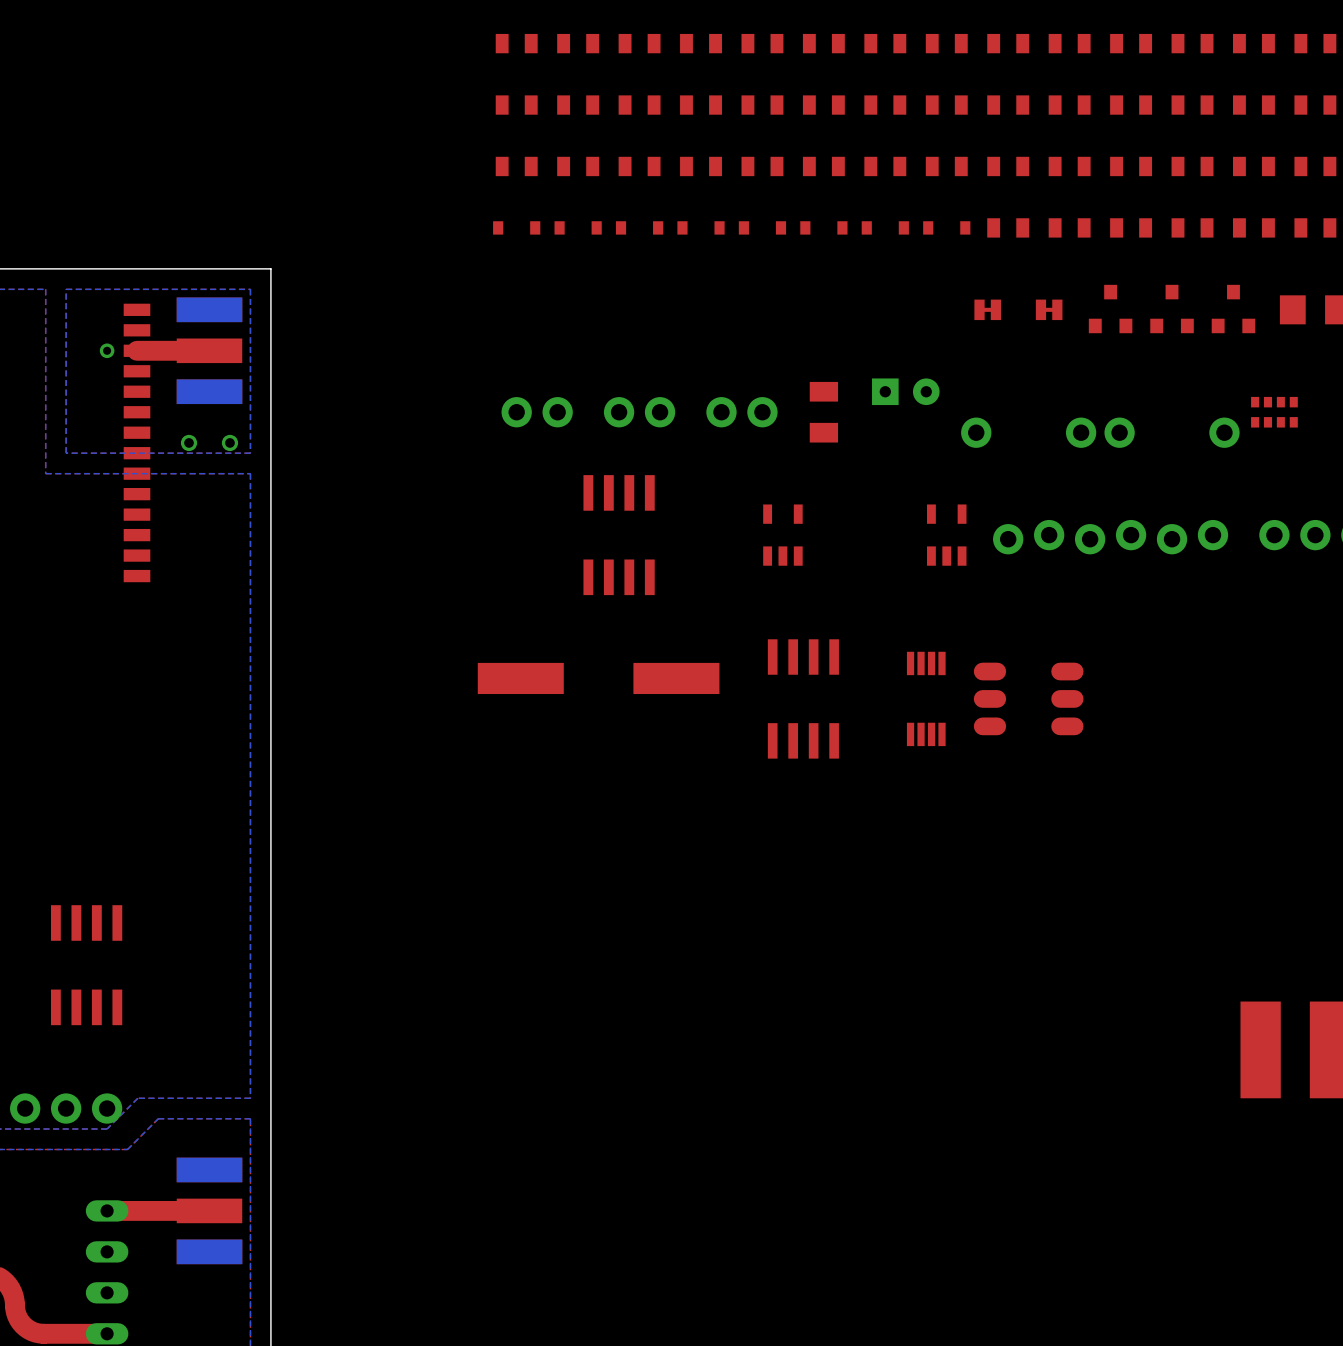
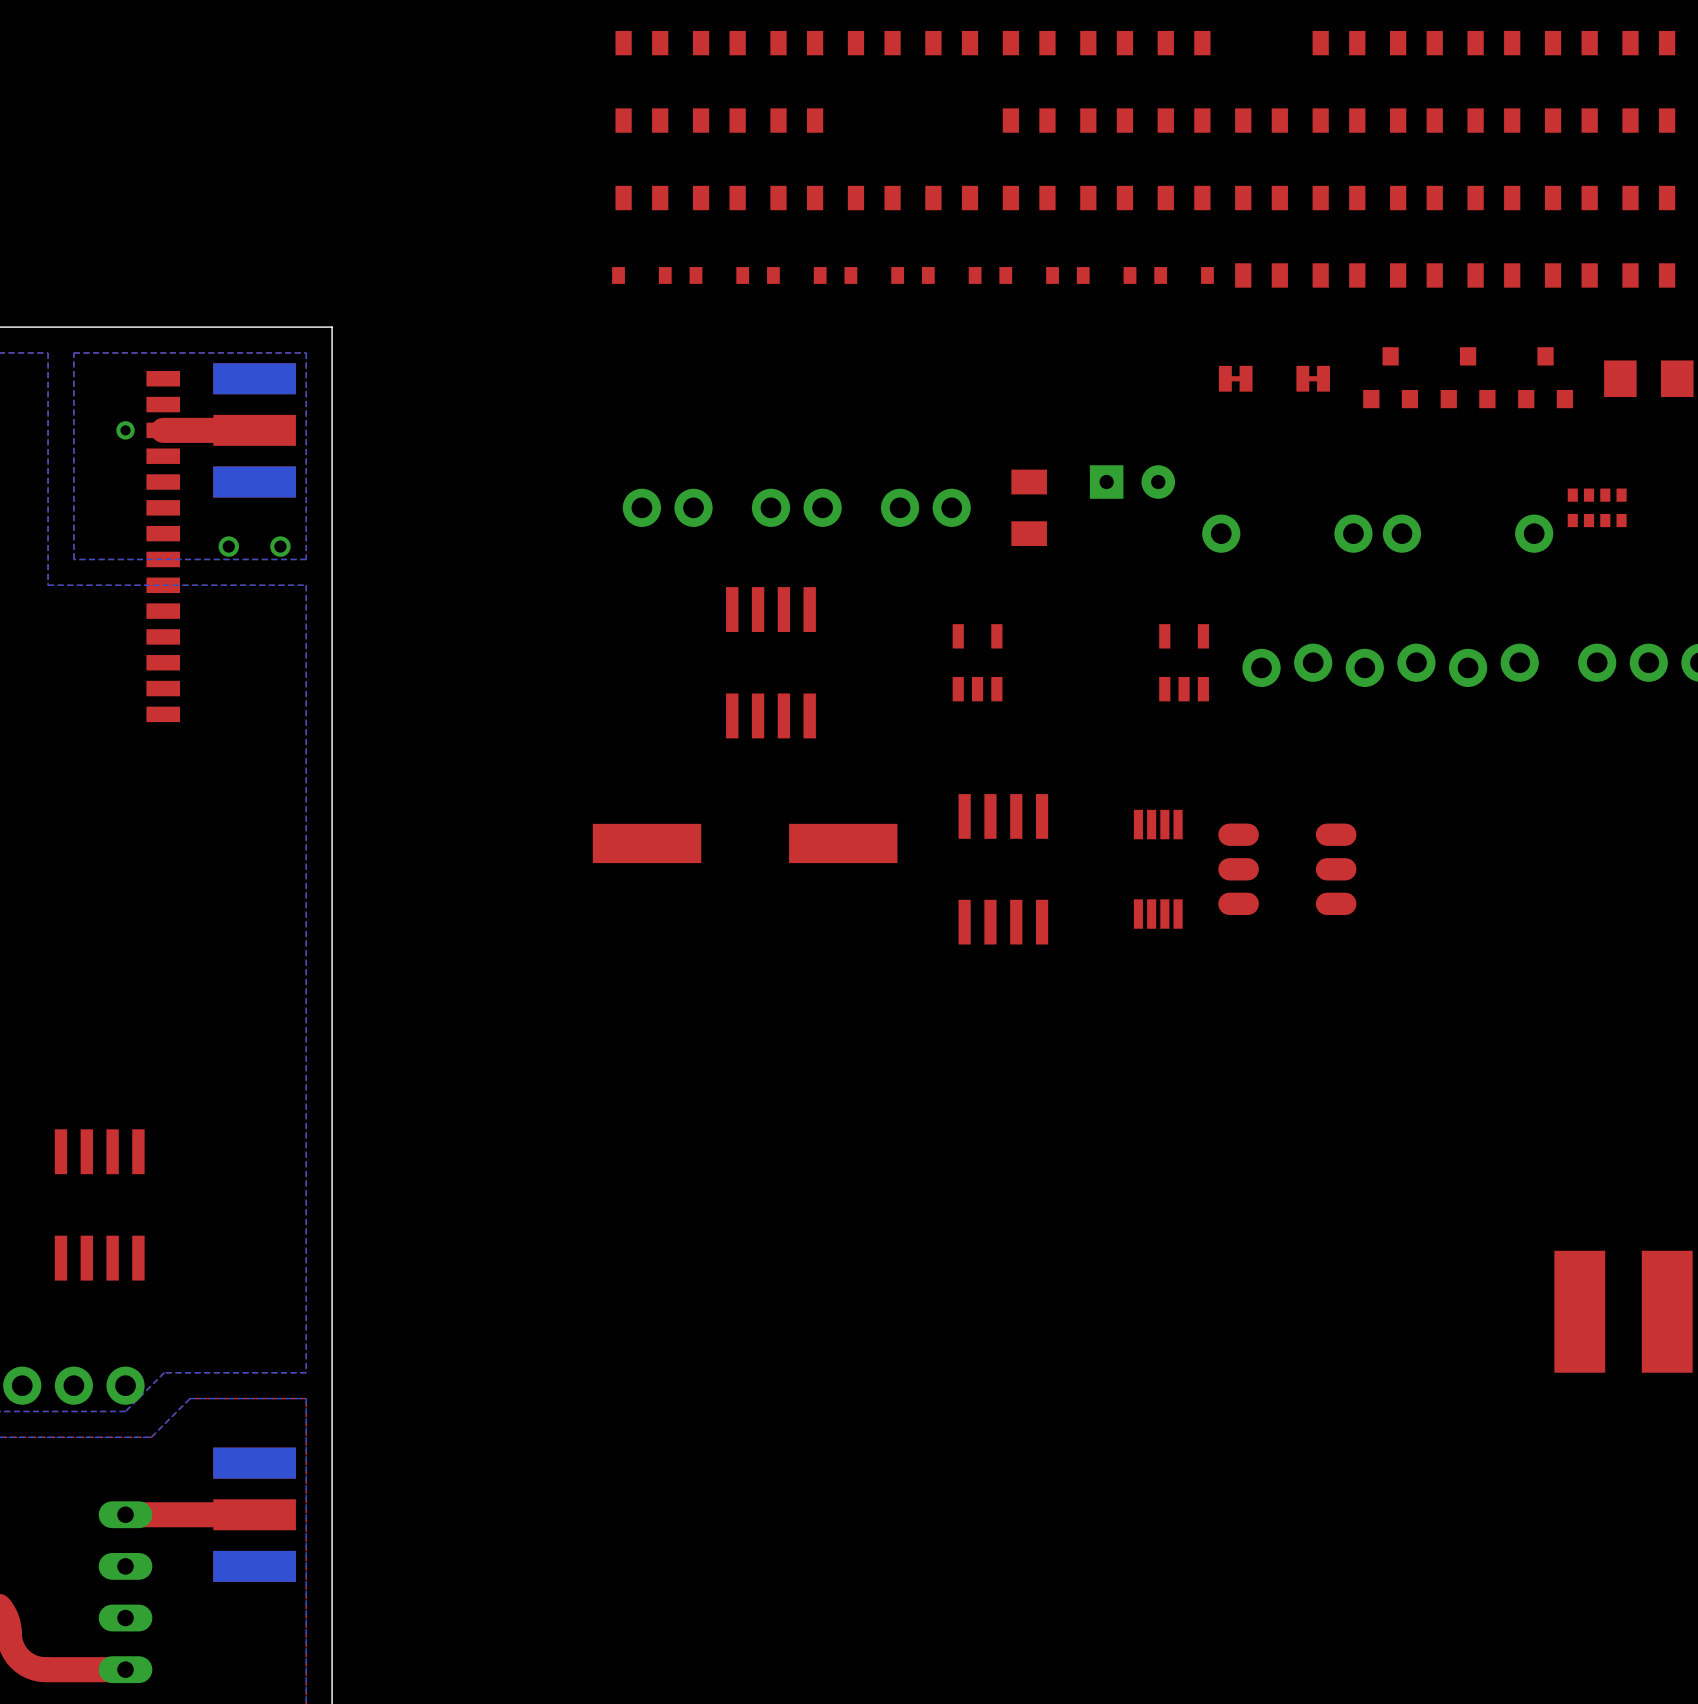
part: (1008, 43) -> none
part: (701, 105) -> none
part: (762, 105) -> none

